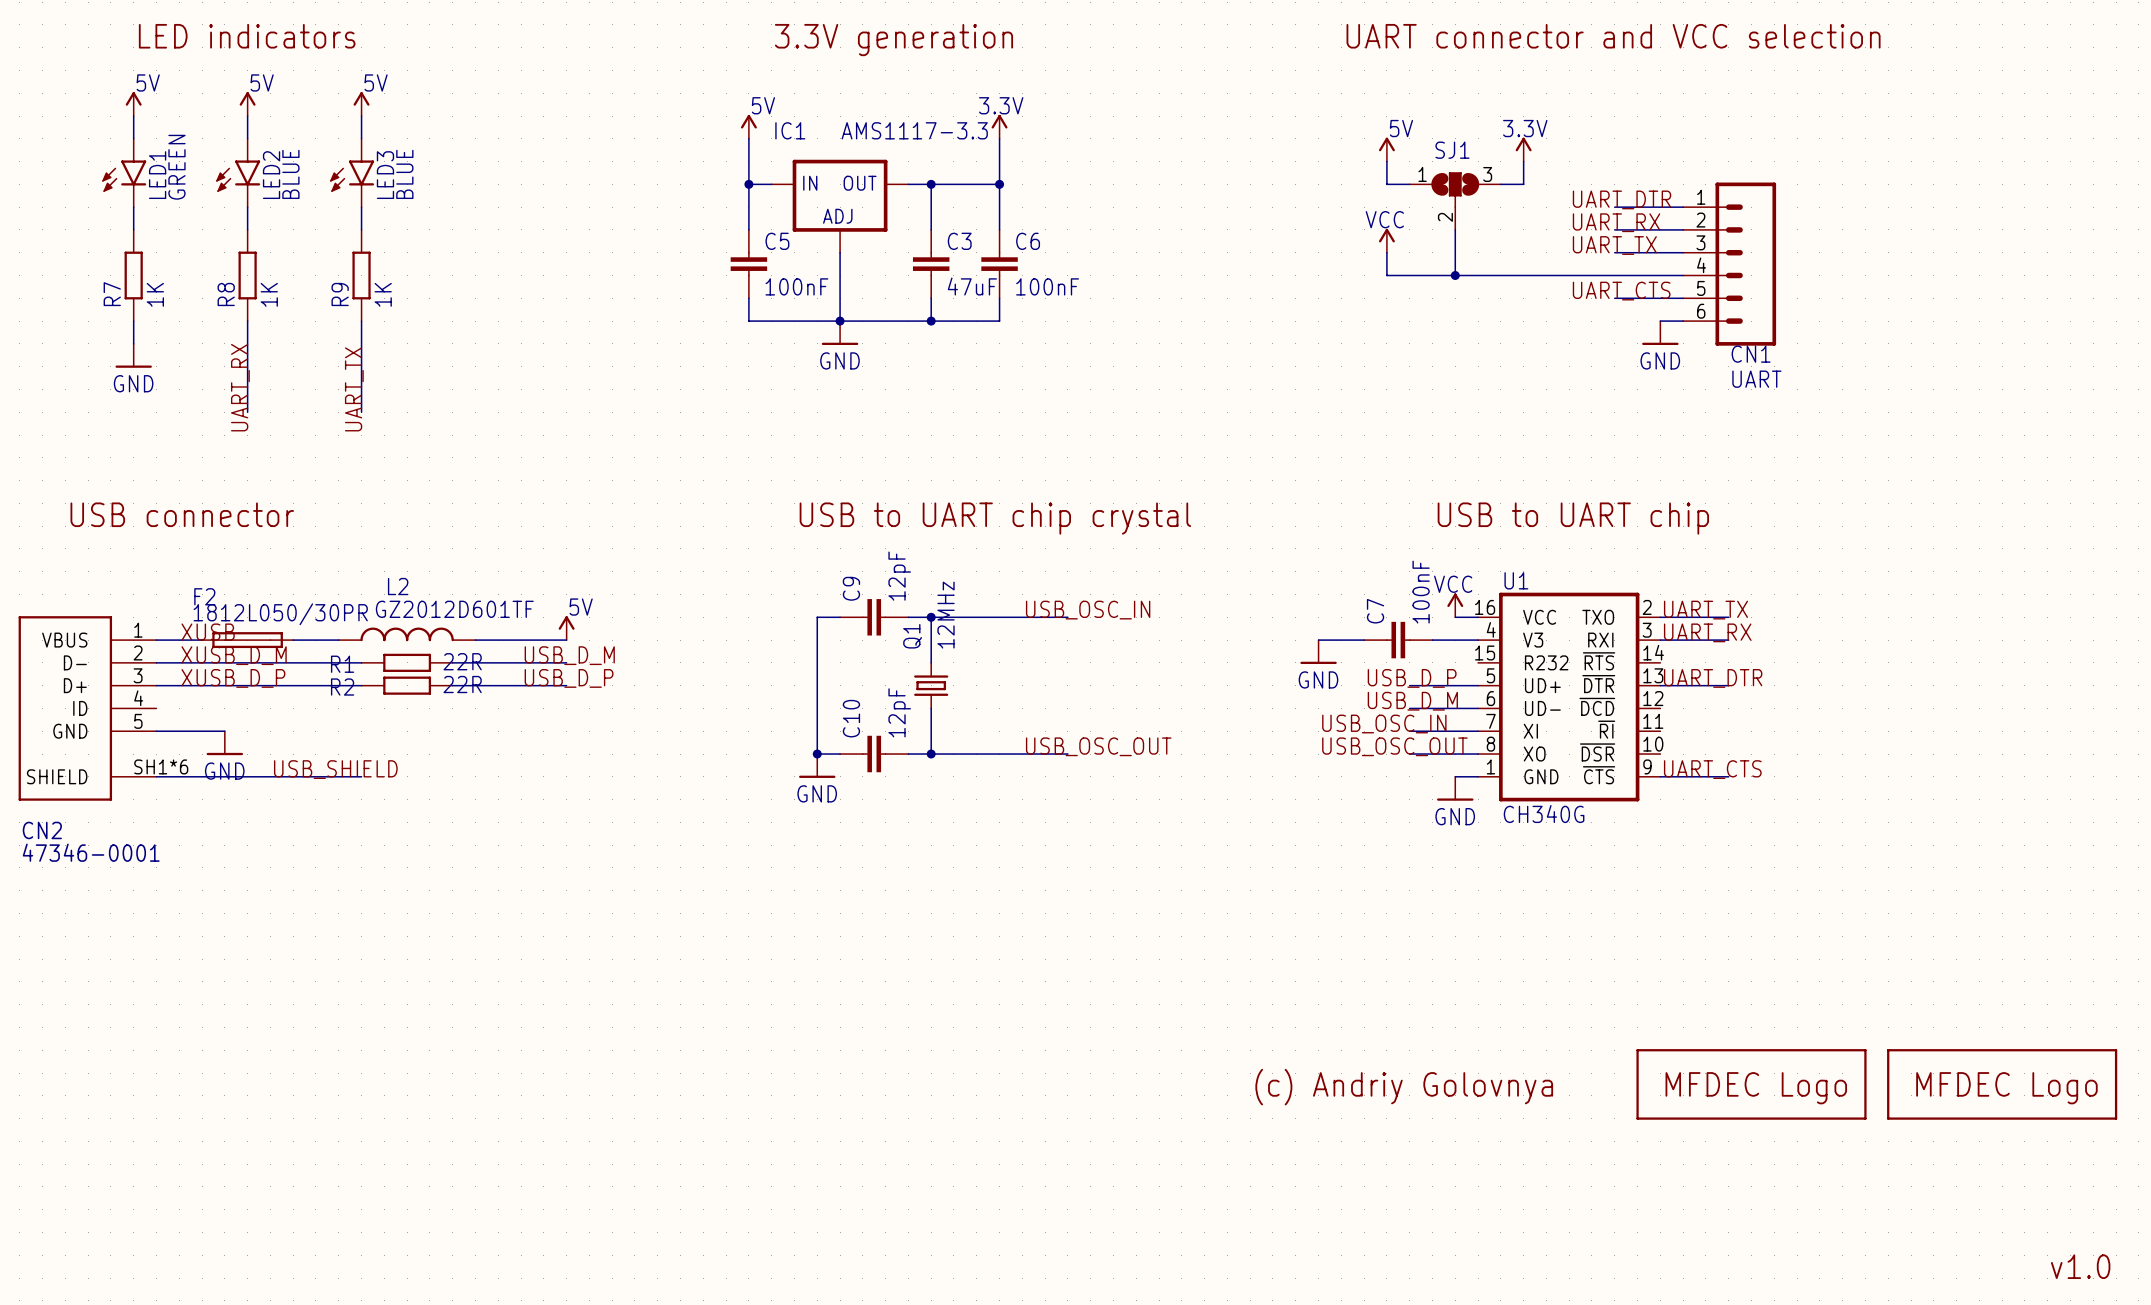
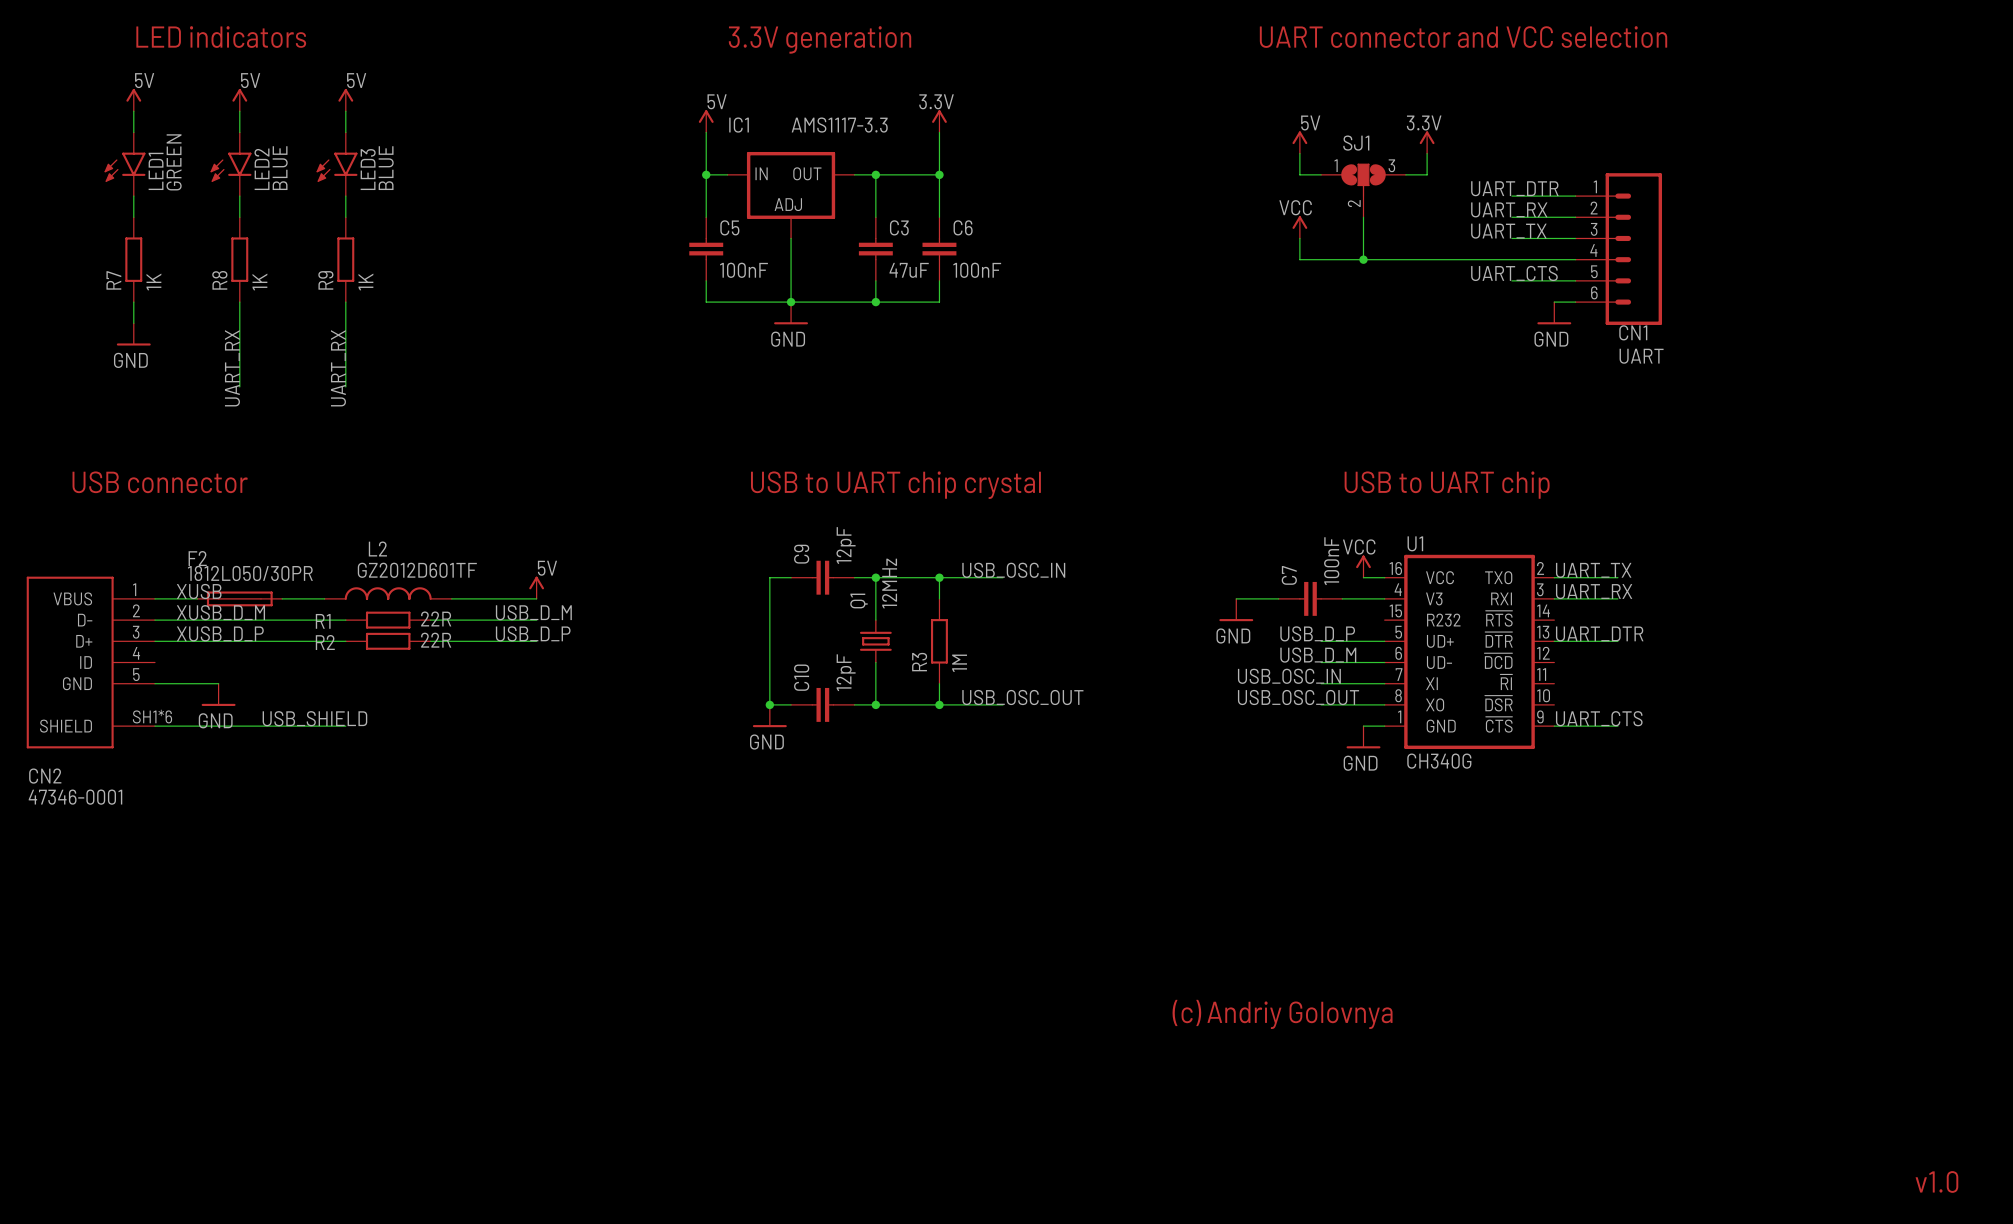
label: UART_TX (354, 389) -> UART_RX (338, 368)
wire: none -> (939, 577) (939, 598)
junction: none -> (939, 577)
R3: none -> 1M (939, 641)
wire: none -> (939, 683) (939, 704)
junction: none -> (939, 704)
part: (1751, 1084) -> none
part: (2002, 1084) -> none

